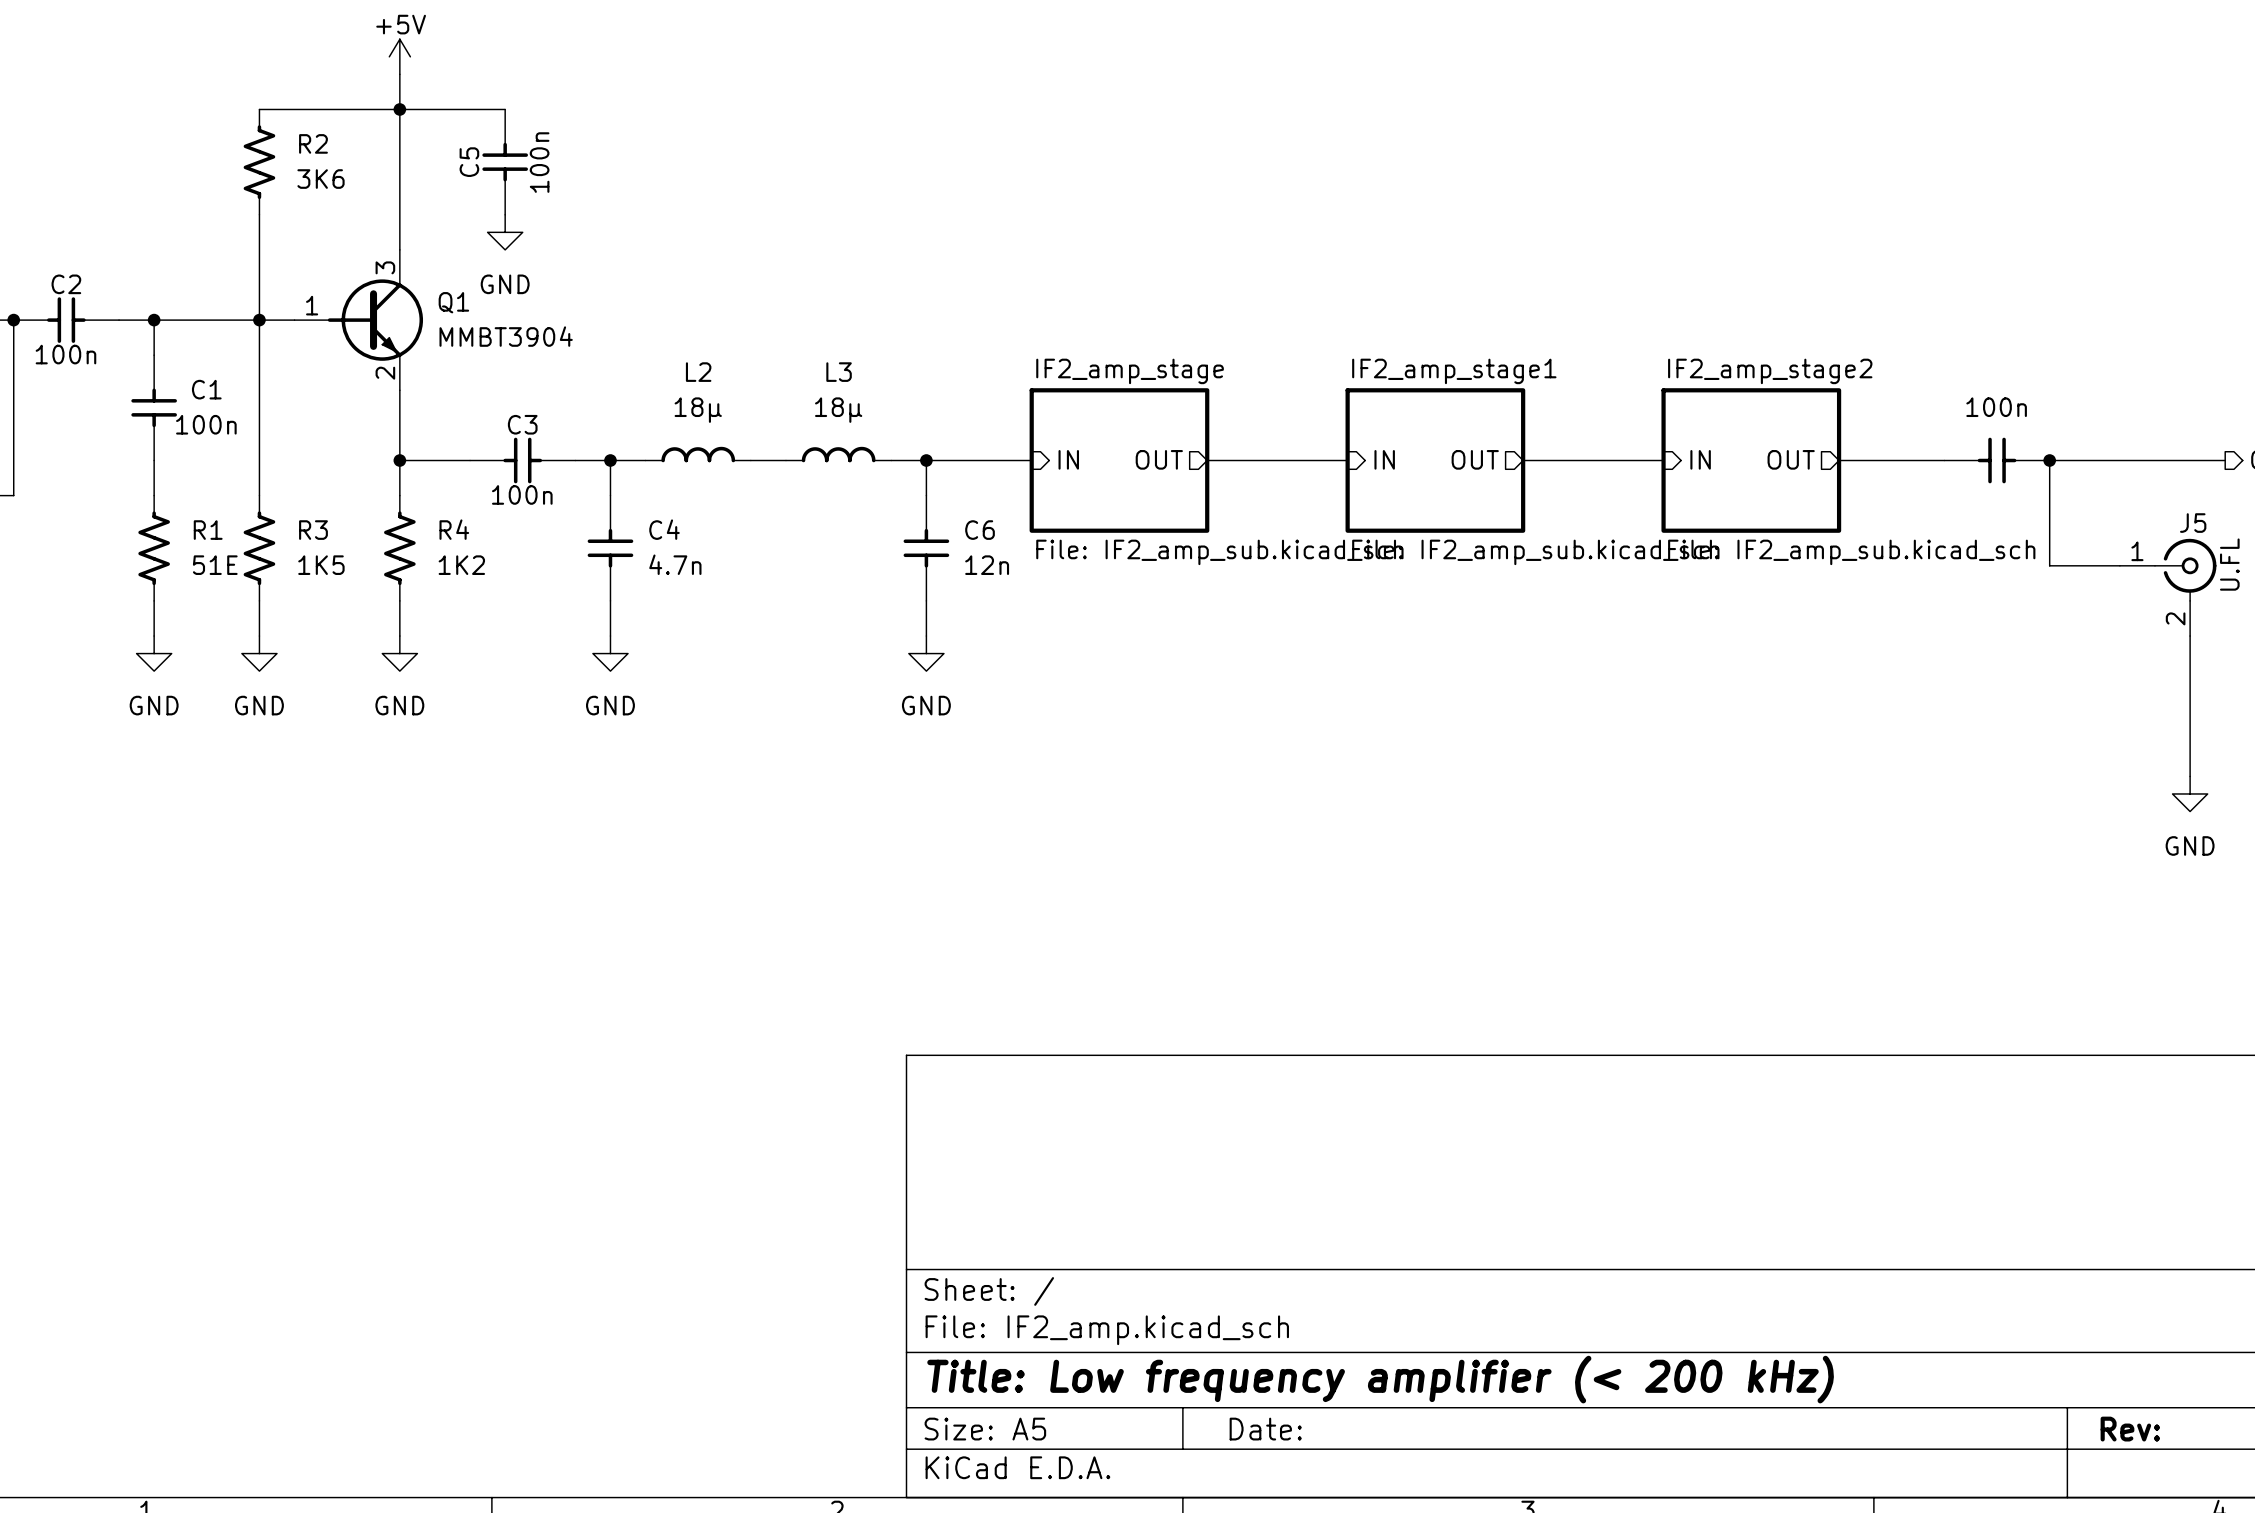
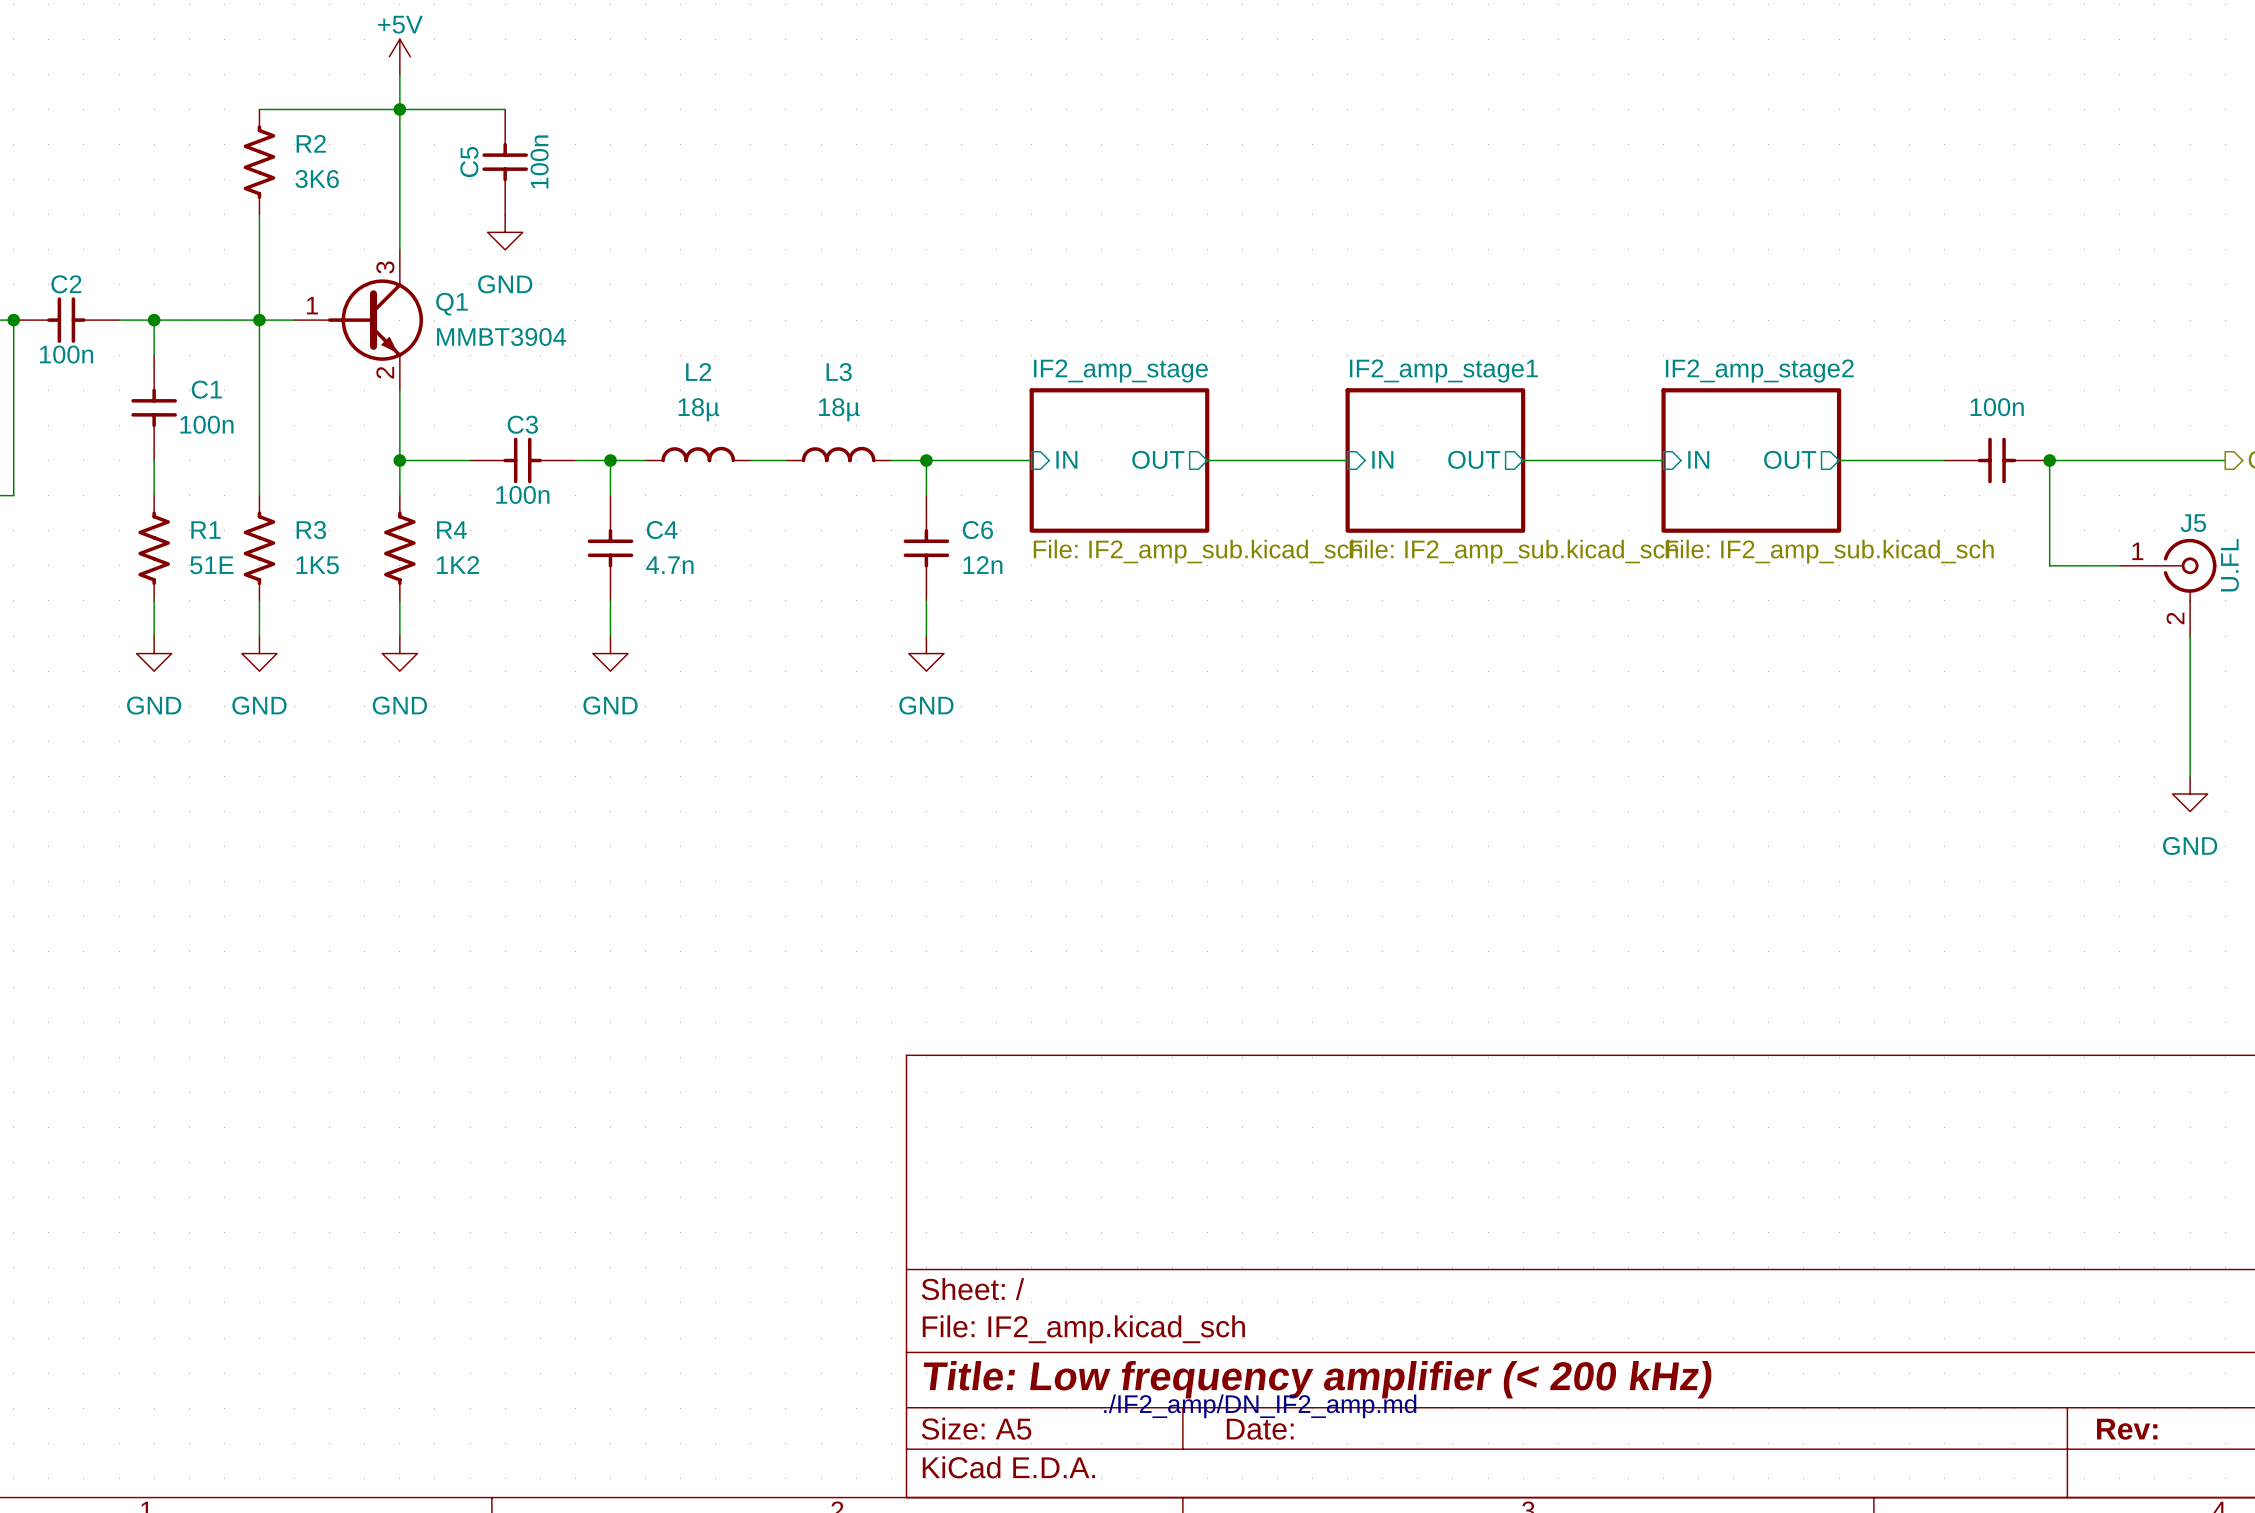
text: none -> ./IF2_amp/DN_IF2_amp.md (1260, 1406)

